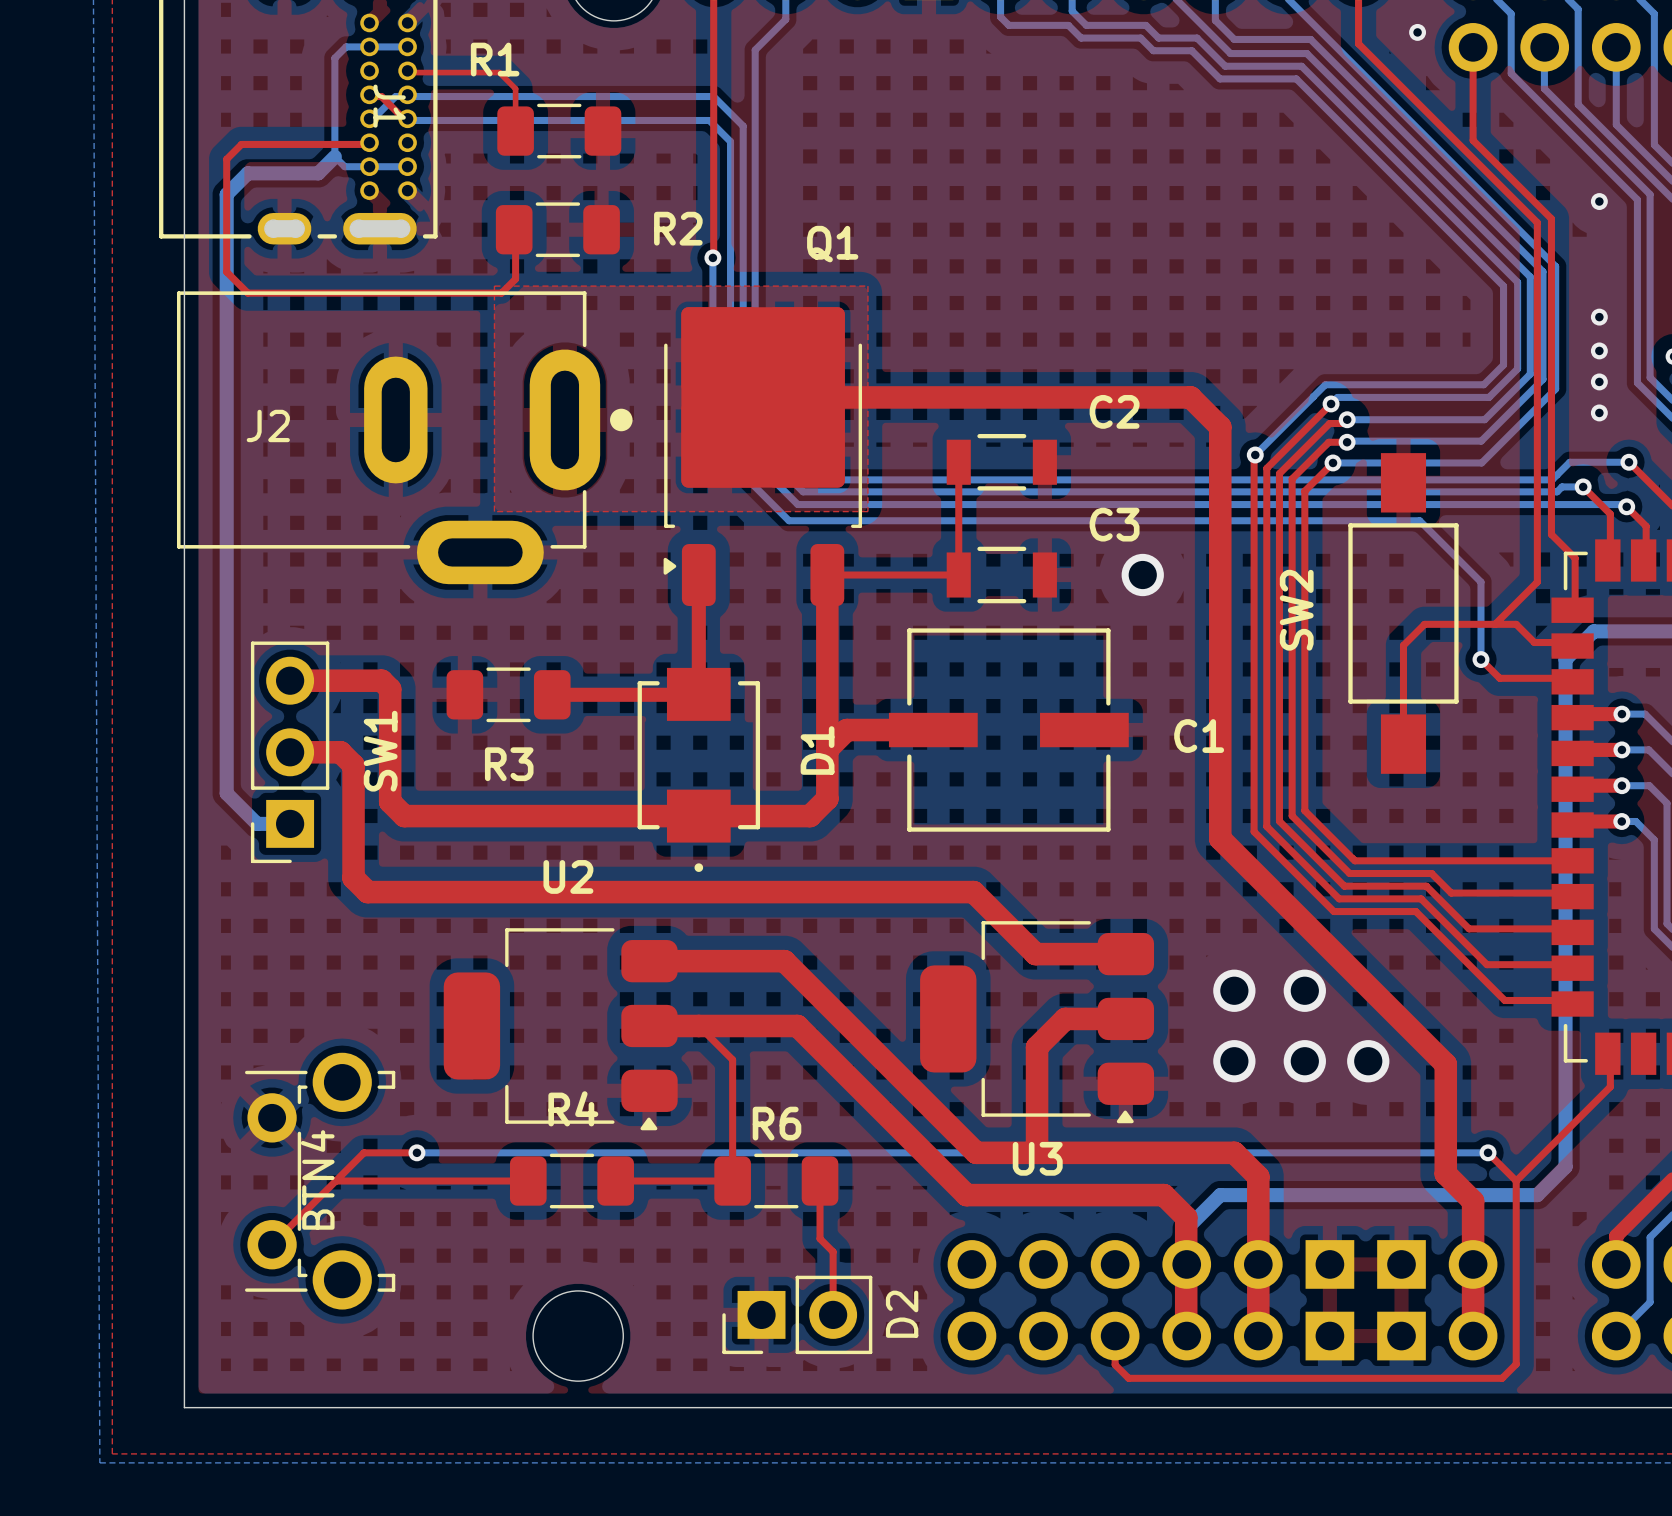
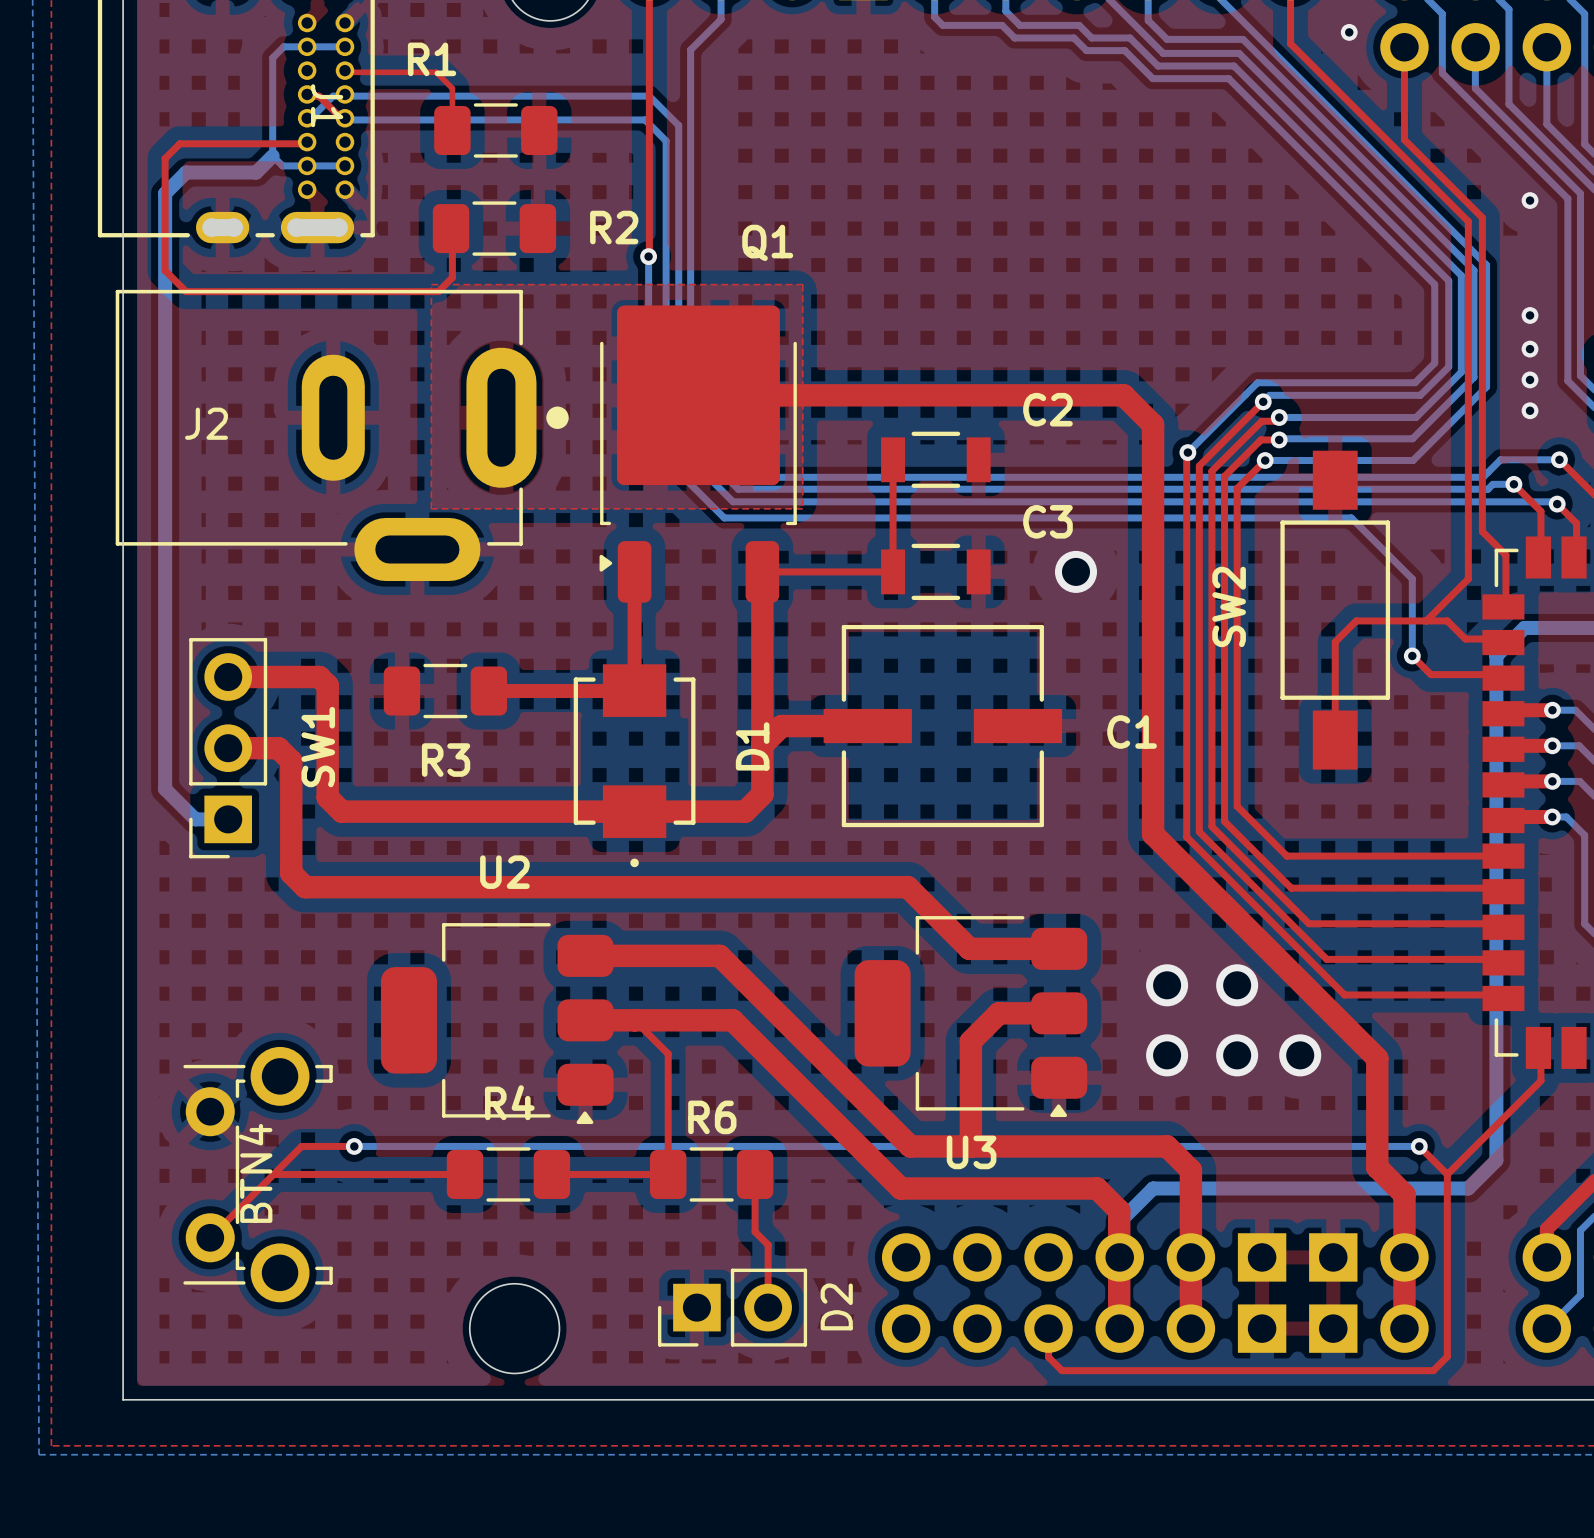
top track: (1292, 816) (1349, 873) (1431, 873) (1451, 893) -> (1224, 811) (1224, 821) (1291, 888) (1382, 888)
top track: (1279, 821) (1344, 886) (1426, 886) (1469, 928) -> (1211, 816) (1211, 826) (1309, 923) (1400, 923)
top track: (1266, 826) (1339, 898) (1421, 898) (1486, 964) -> (1199, 821) (1199, 831) (1326, 959) (1418, 959)
top track: (1254, 831) (1333, 911) (1415, 911) (1504, 1000) -> (1186, 827) (1186, 837) (1344, 994) (1436, 994)

